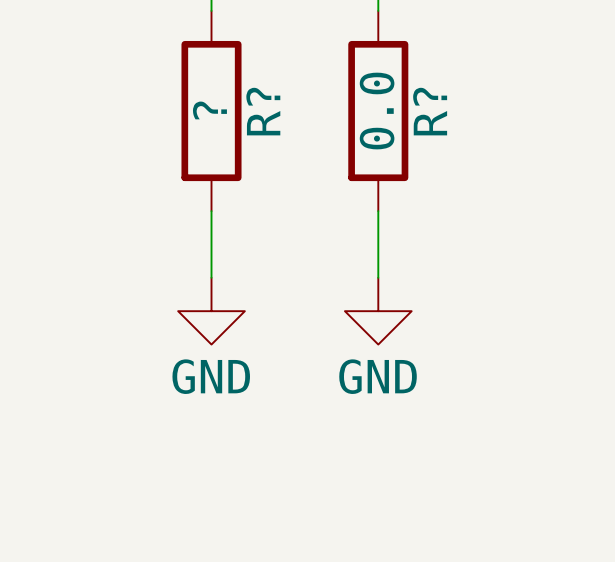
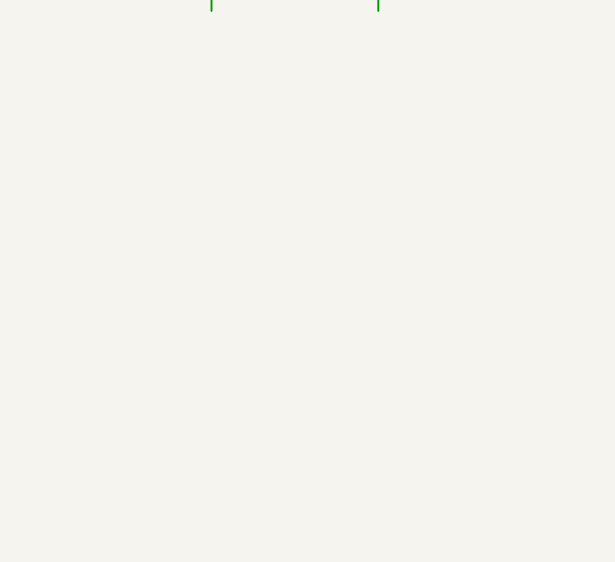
R?: ? (211, 111) -> none
R?: 0.0 (378, 111) -> none
wire: (211, 211) (211, 277) -> none
wire: (378, 211) (378, 277) -> none
power symbol: GND (211, 311) -> none
power symbol: GND (378, 311) -> none

